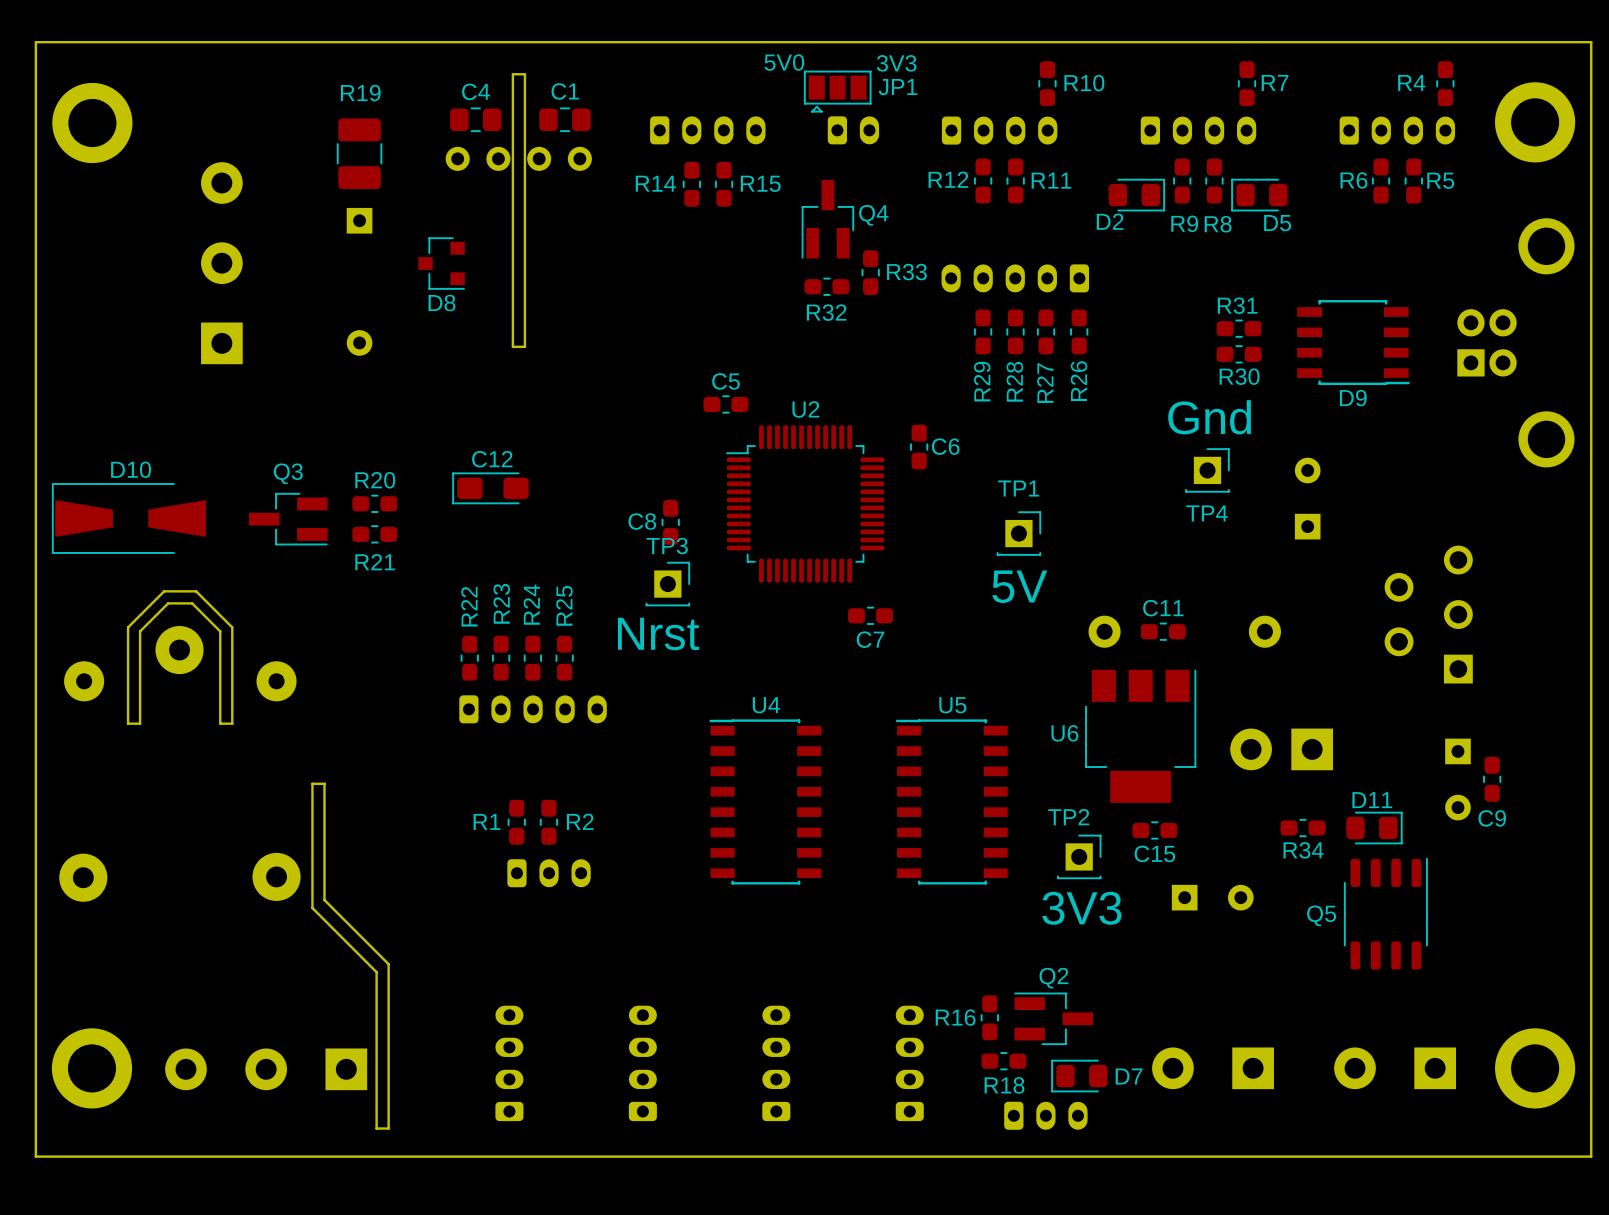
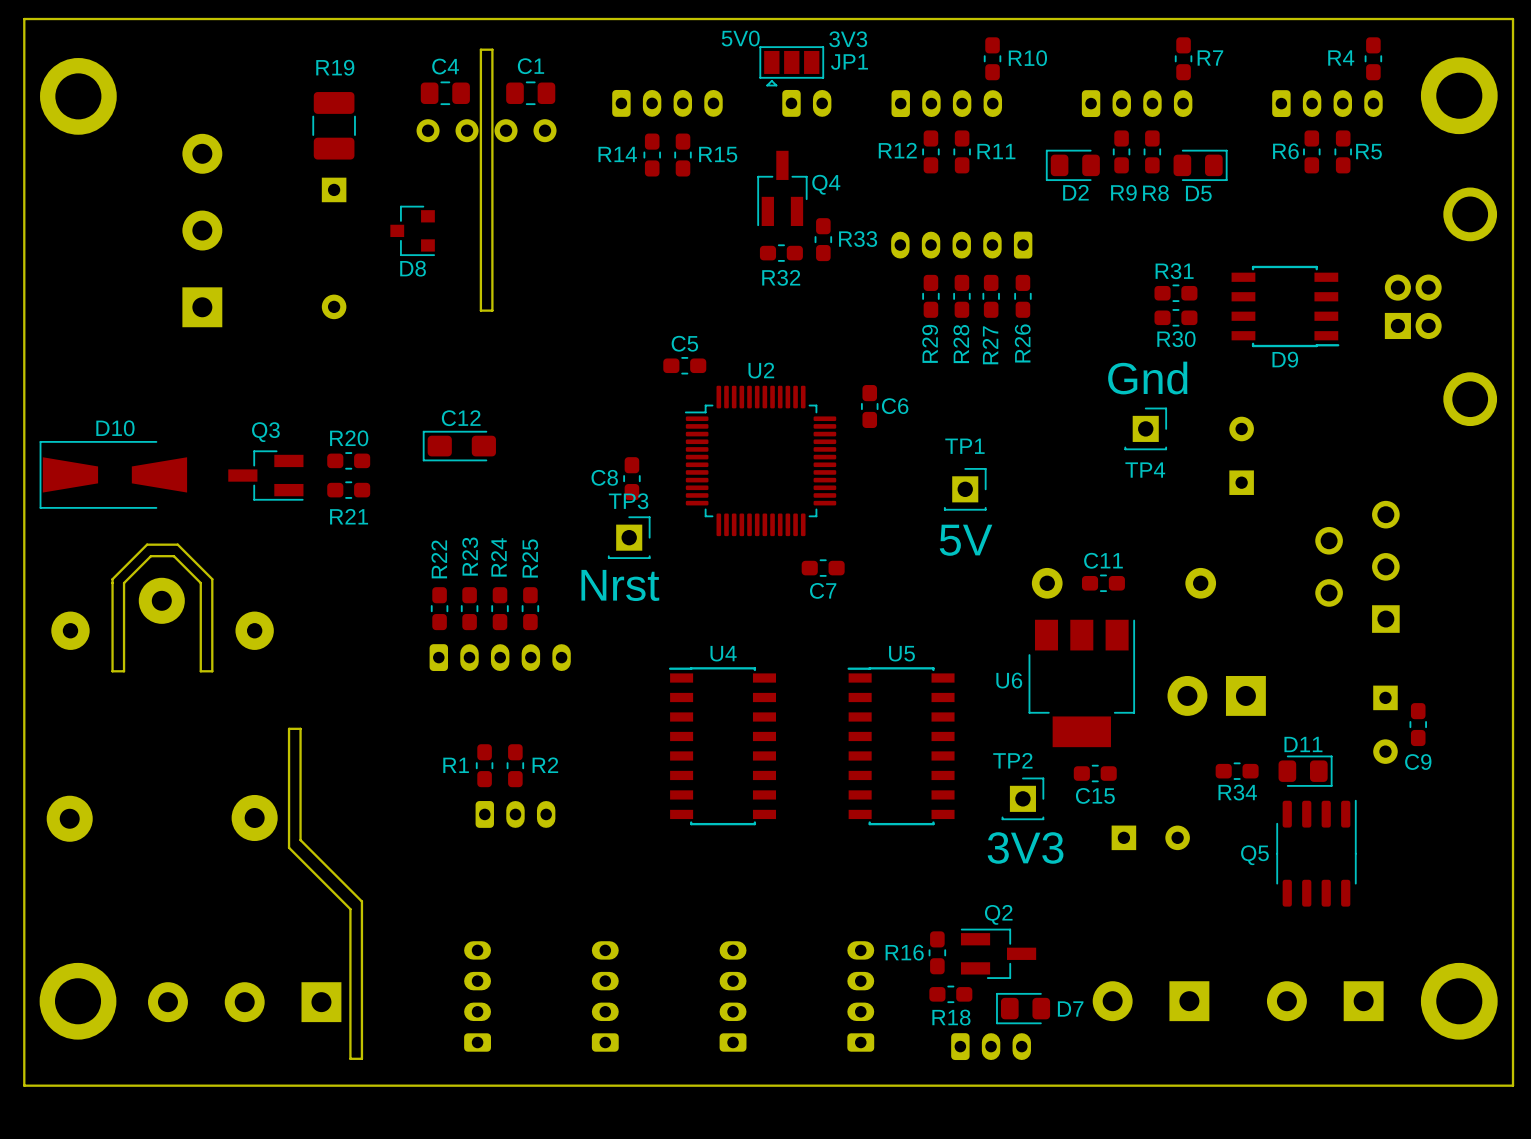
D2 rotation: 0° (1136, 195) -> 180° (1072, 165)
D5 rotation: 0° (1259, 195) -> 180° (1200, 165)

